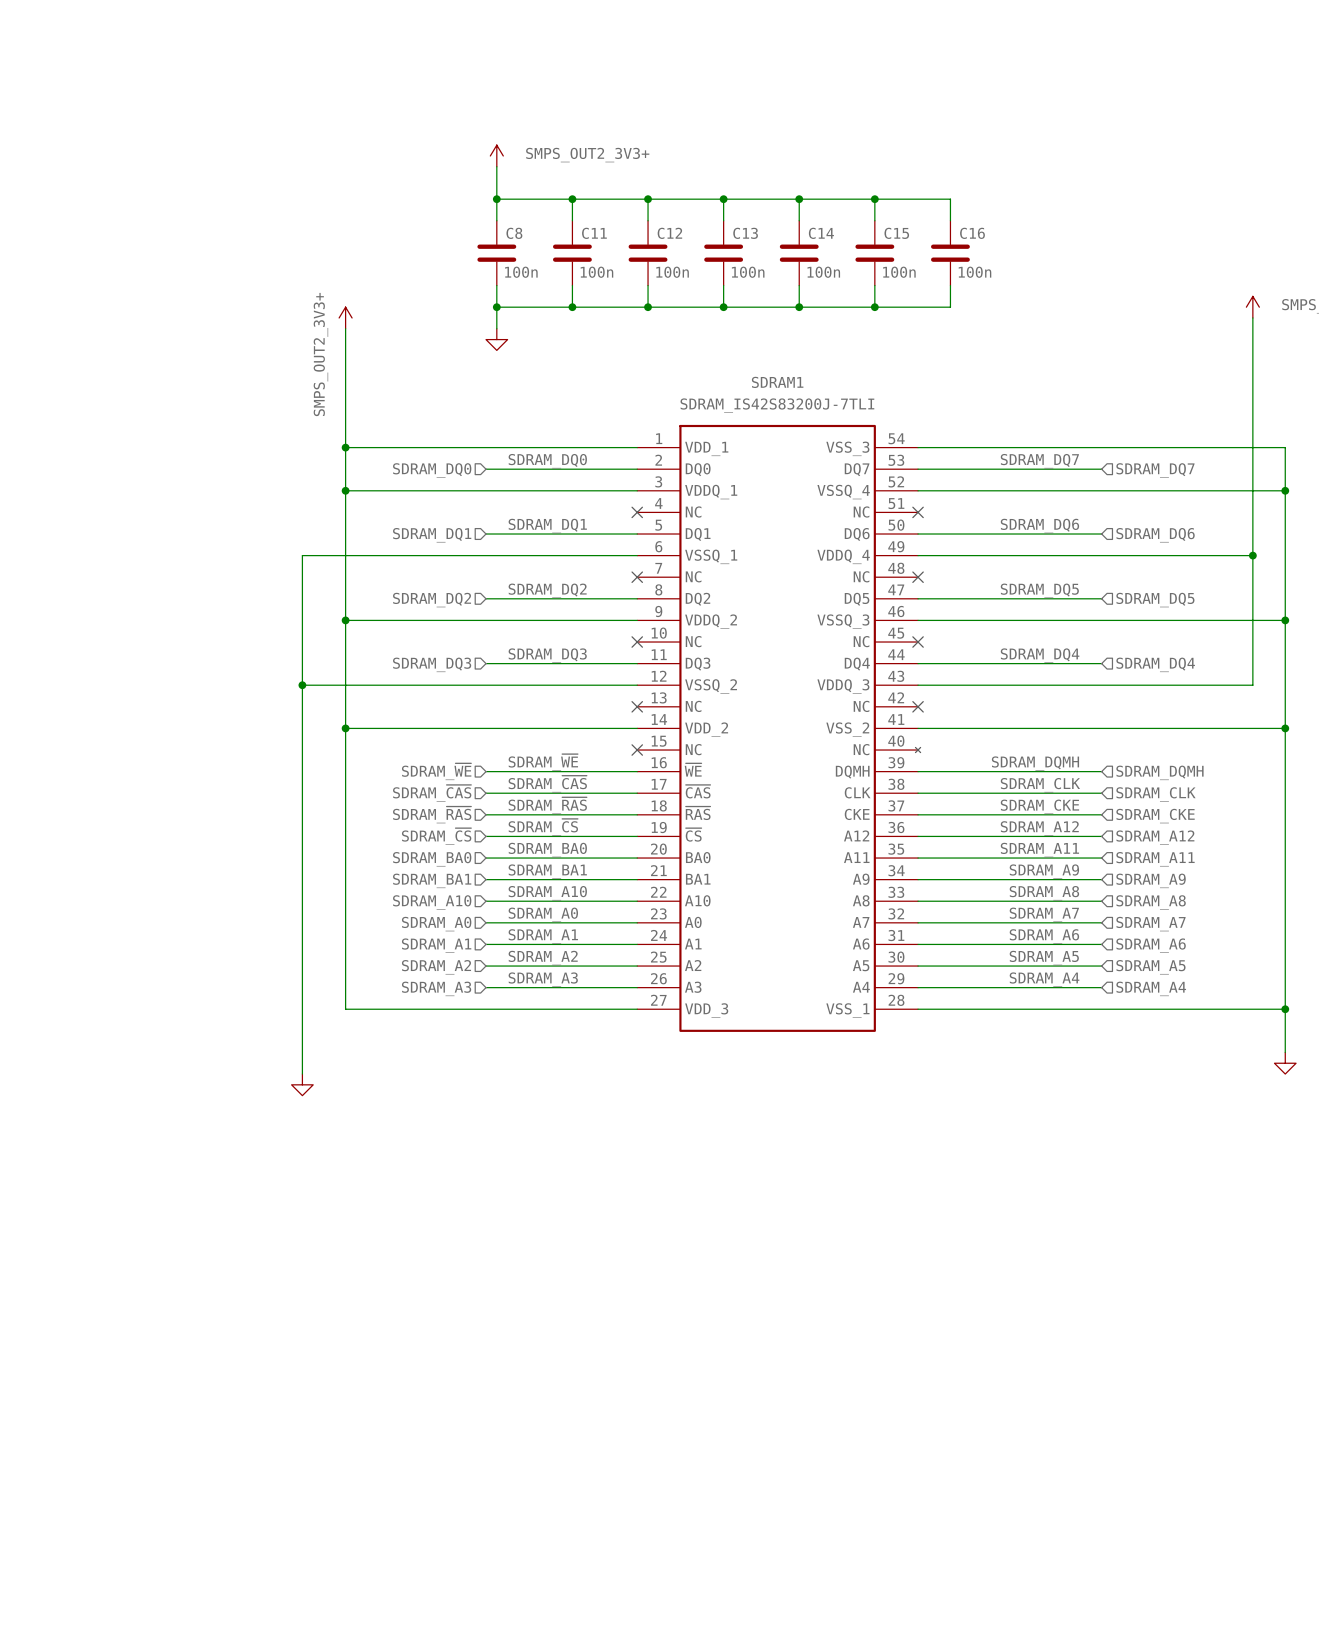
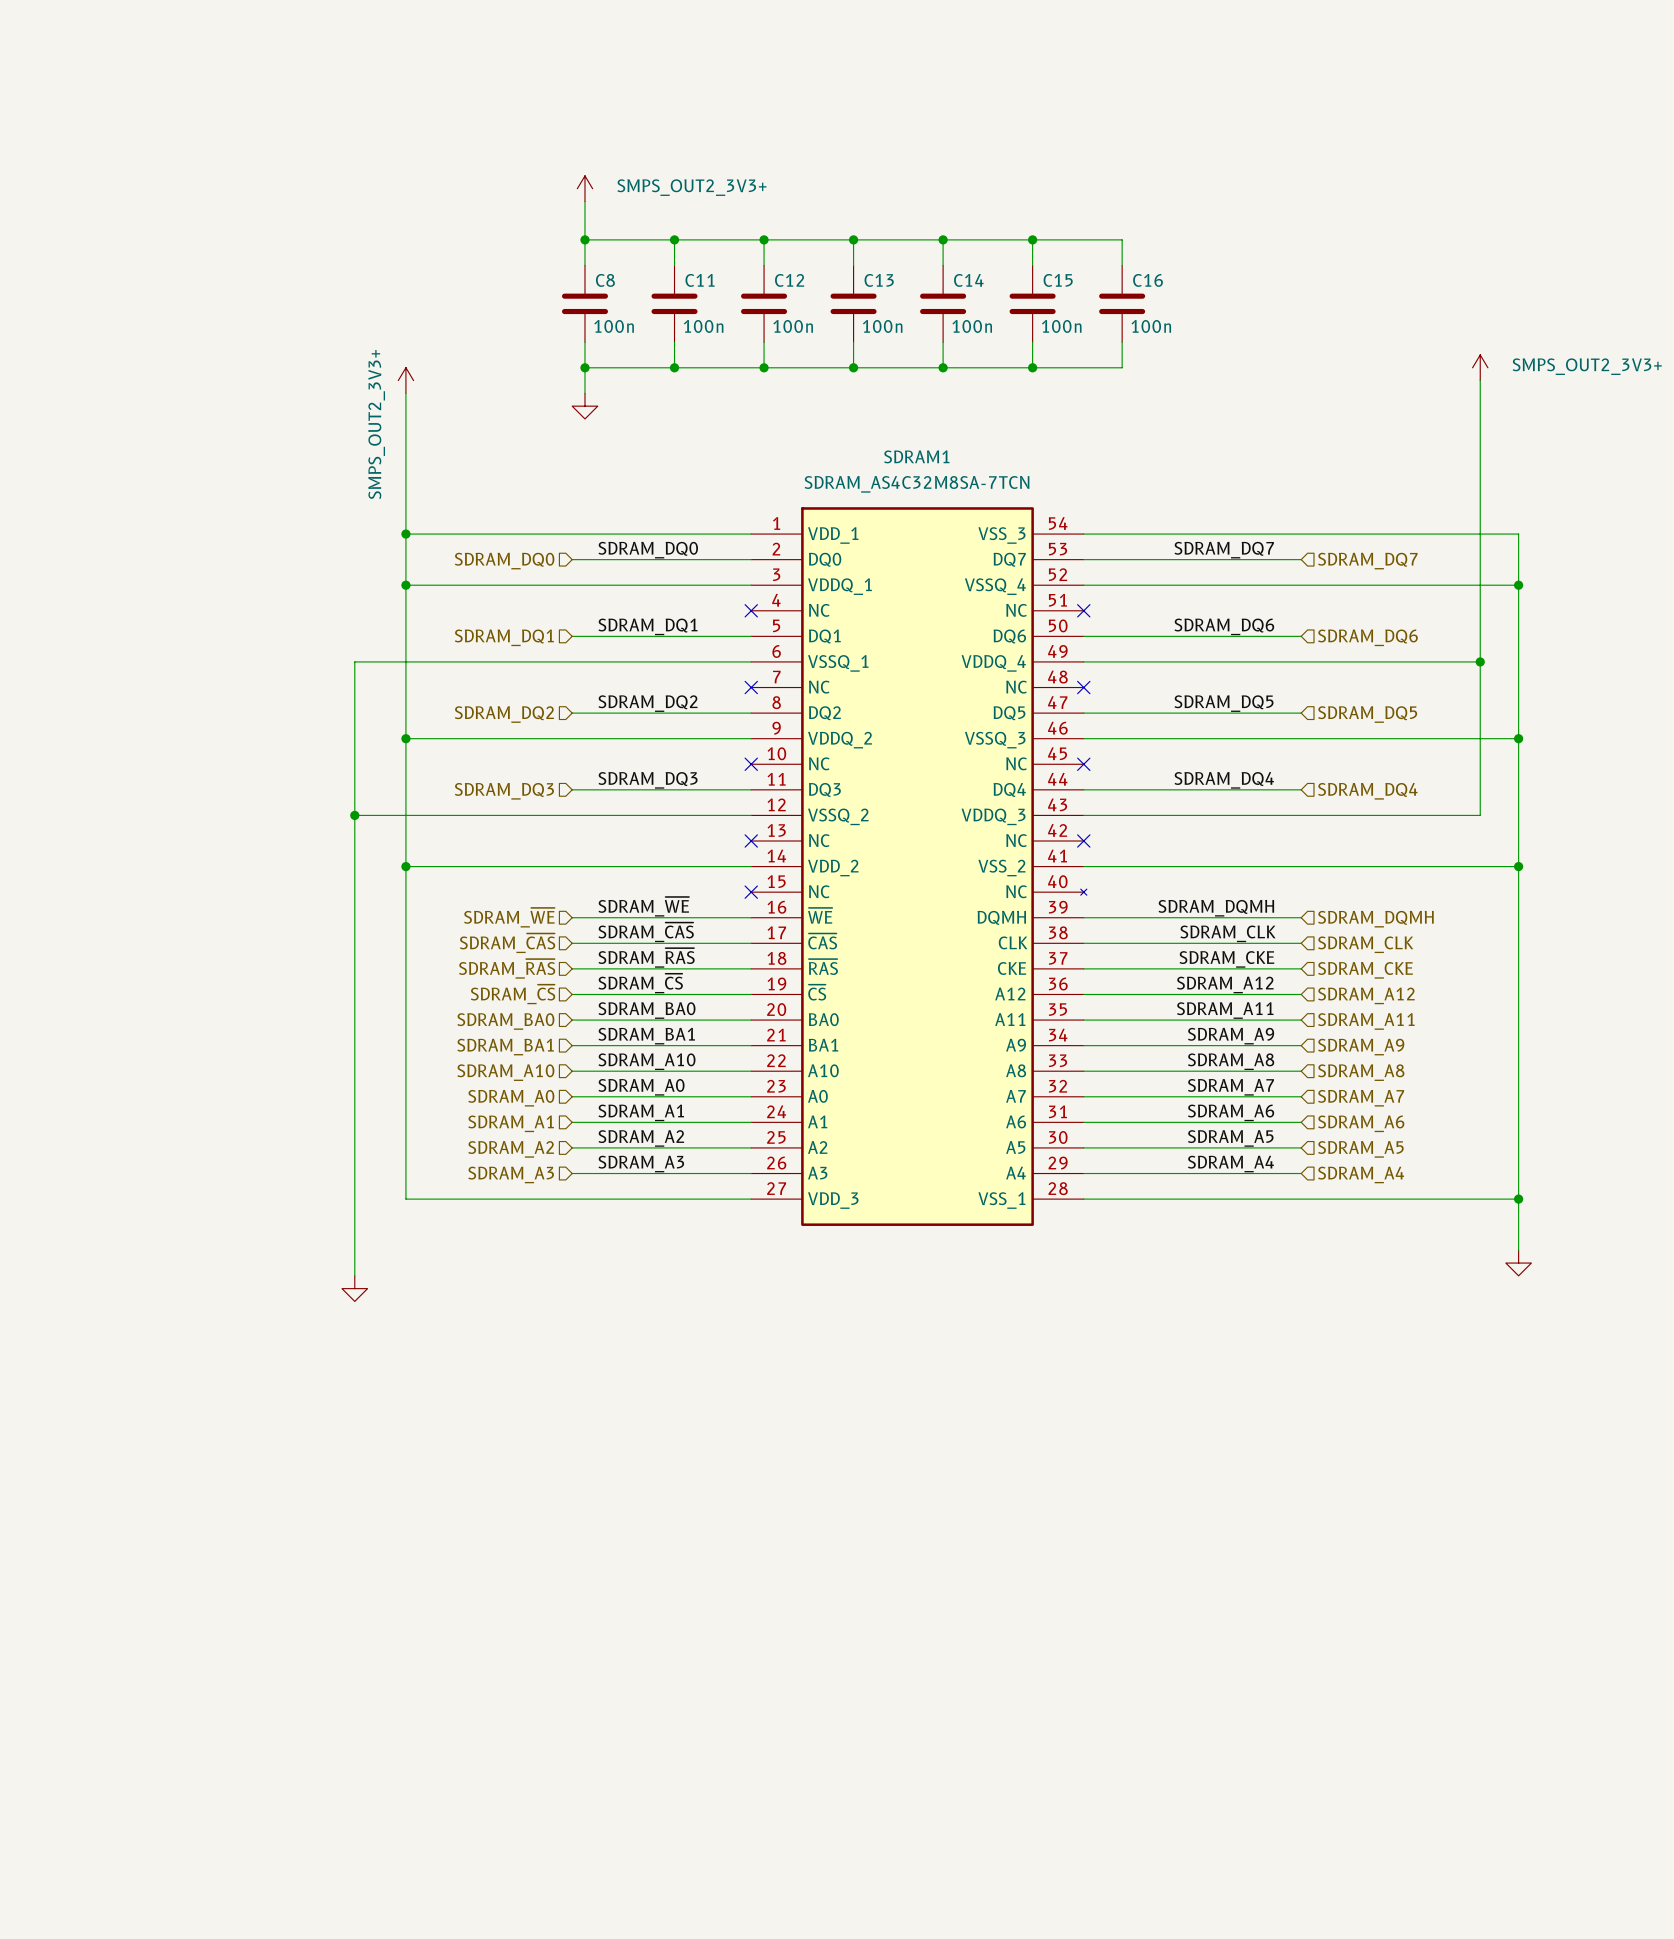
SDRAM1 value: SDRAM_IS42S83200J-7TLI (777, 405) -> SDRAM_AS4C32M8SA-7TCN (916, 484)

